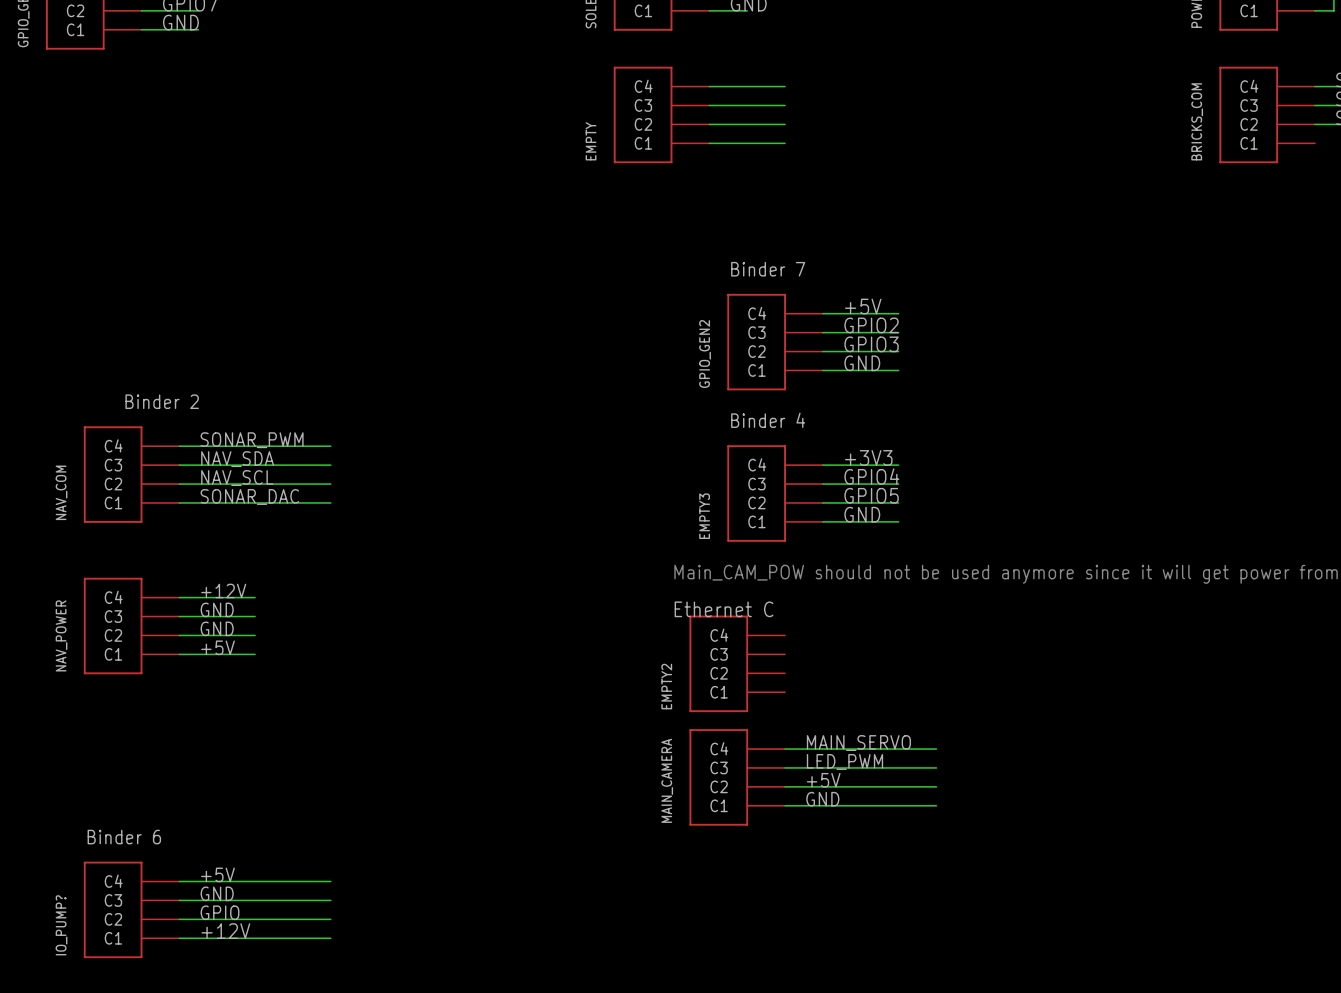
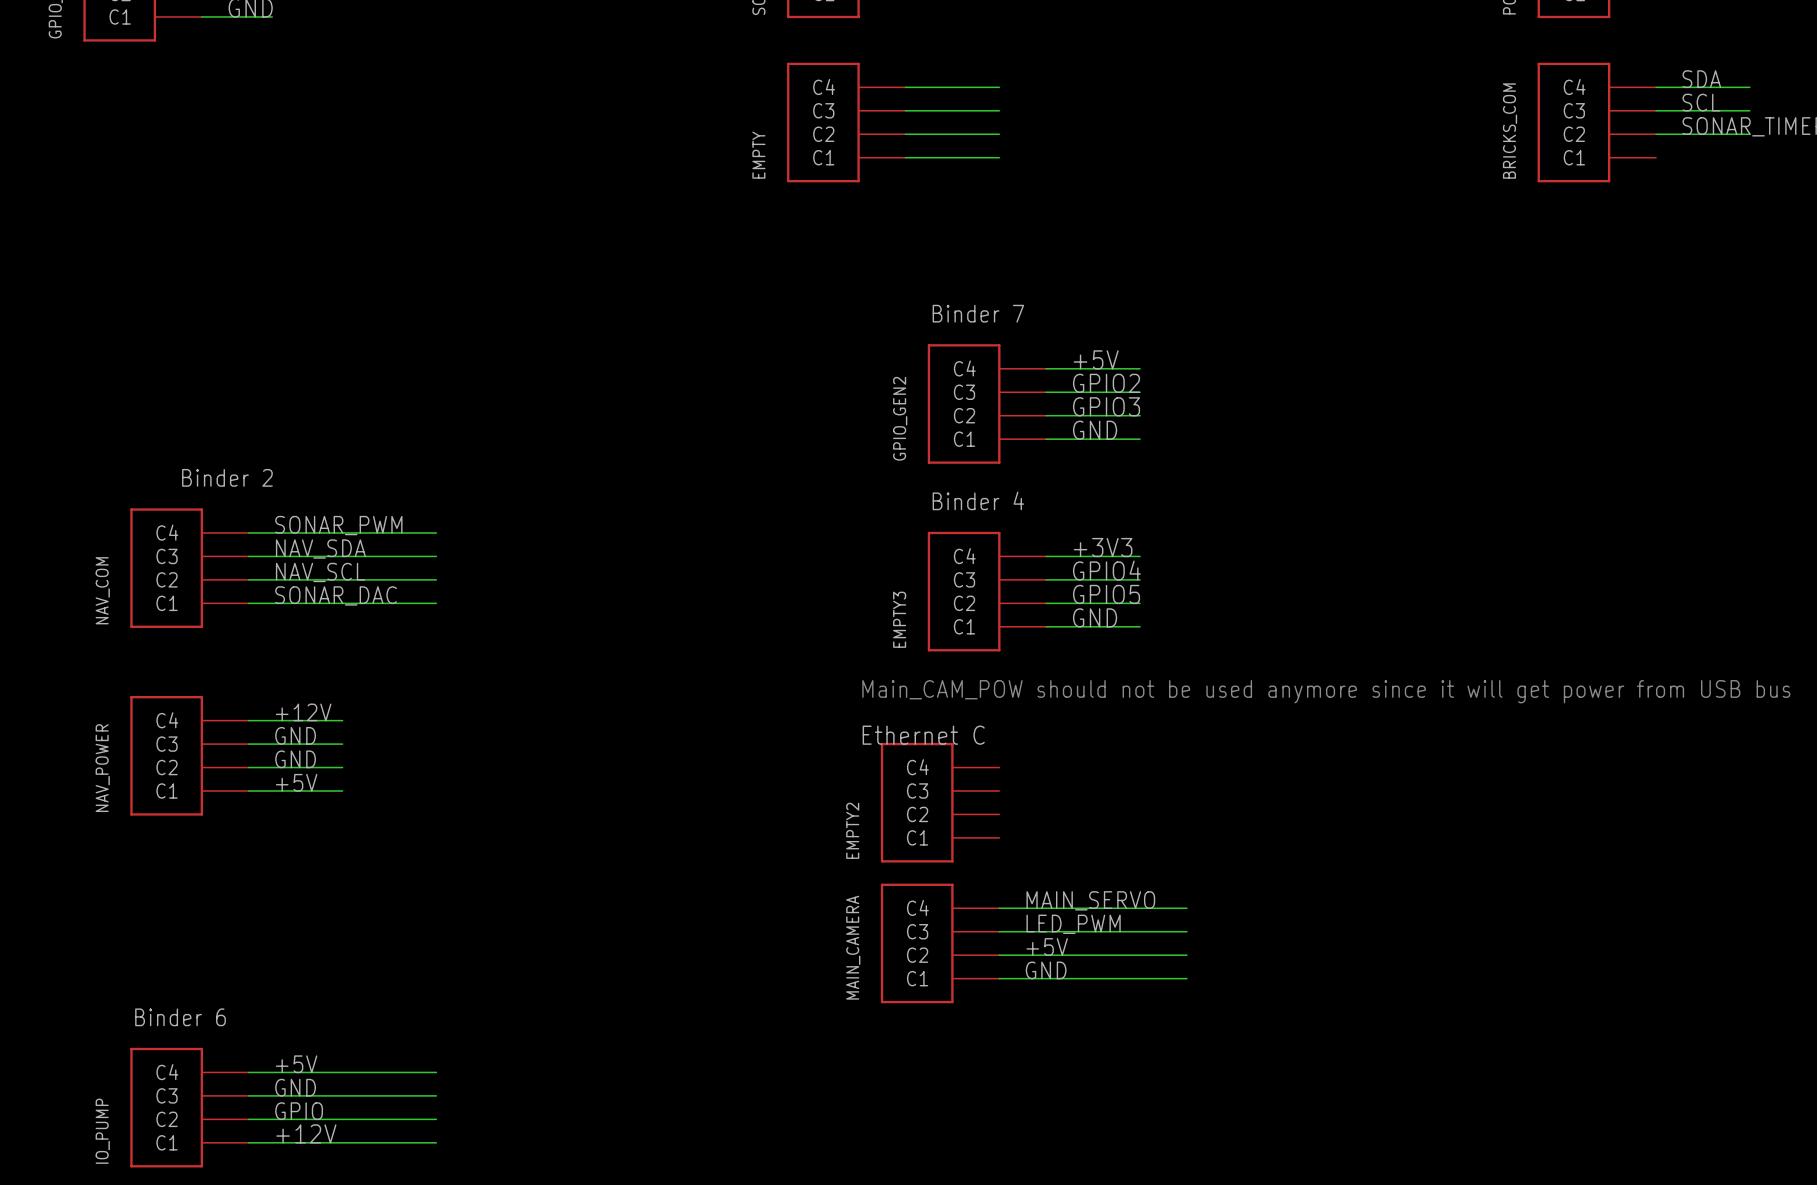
IO_PUMP? name: IO_PUMP? (61, 925) -> IO_PUMP (102, 1131)

